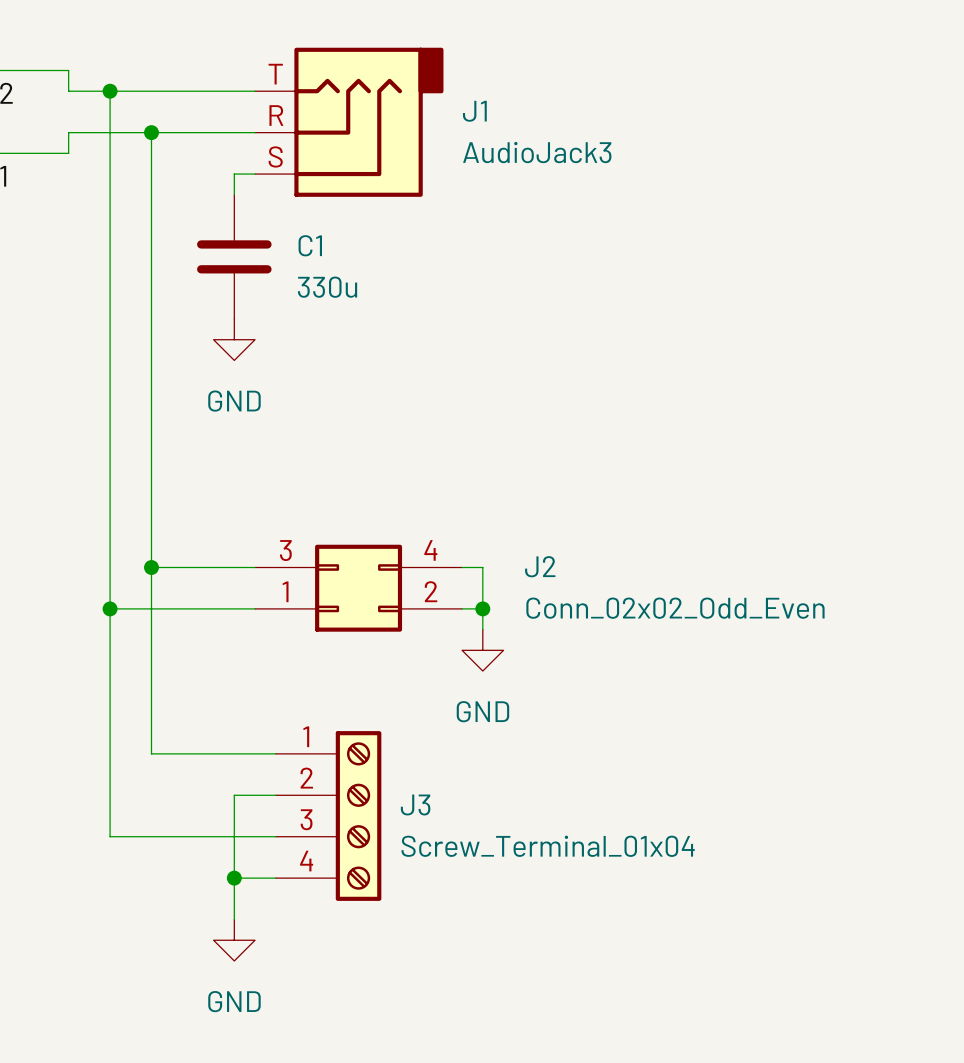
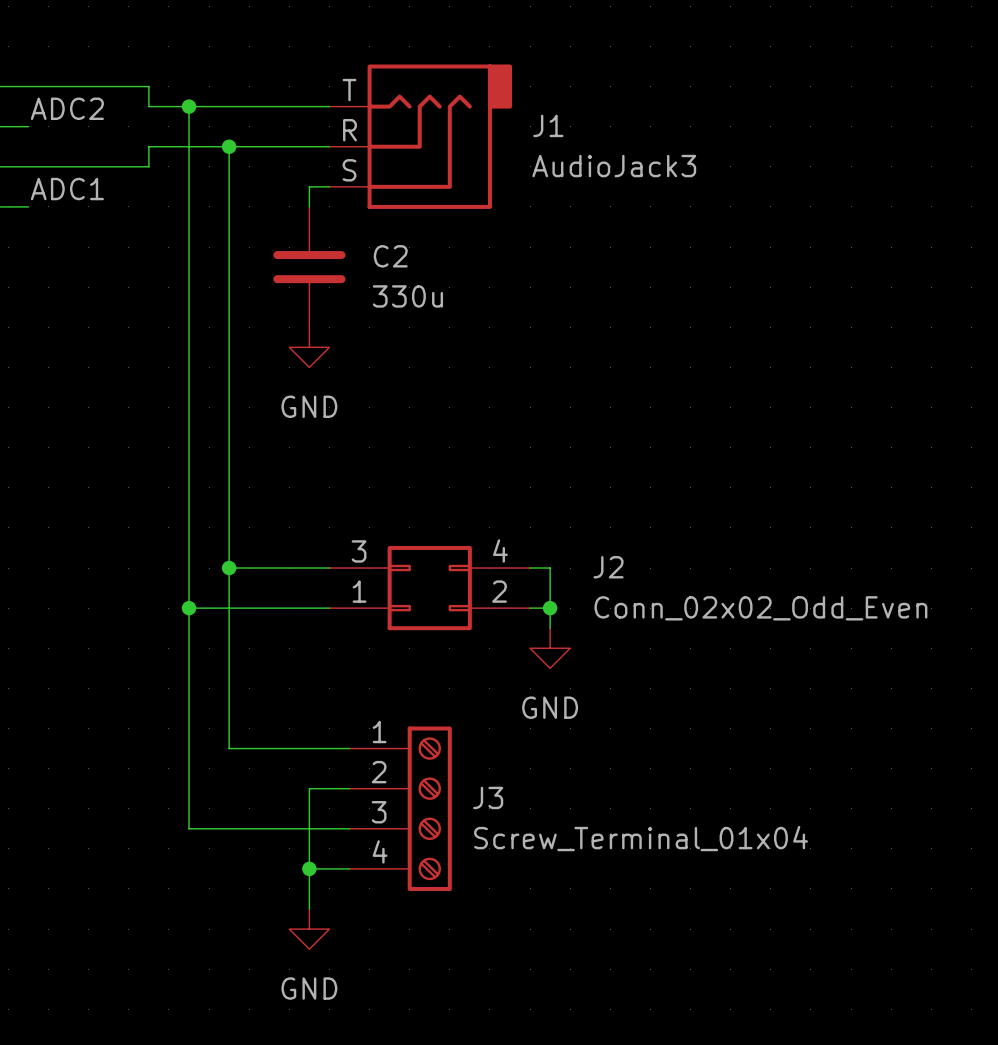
C1 name: C1 (310, 245) -> C2 (390, 256)

